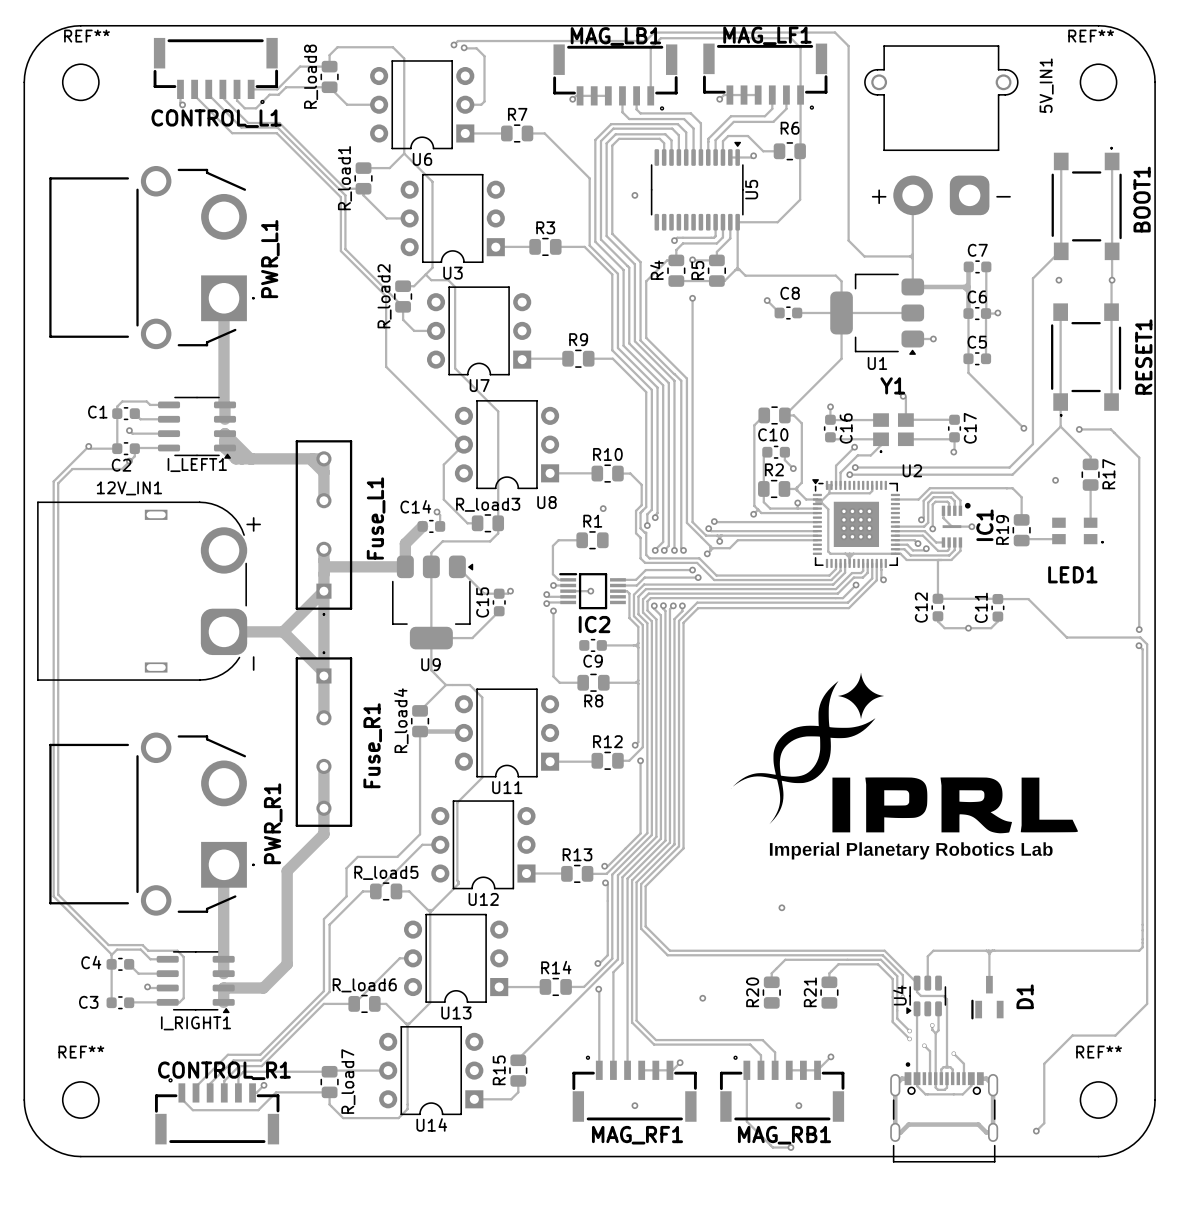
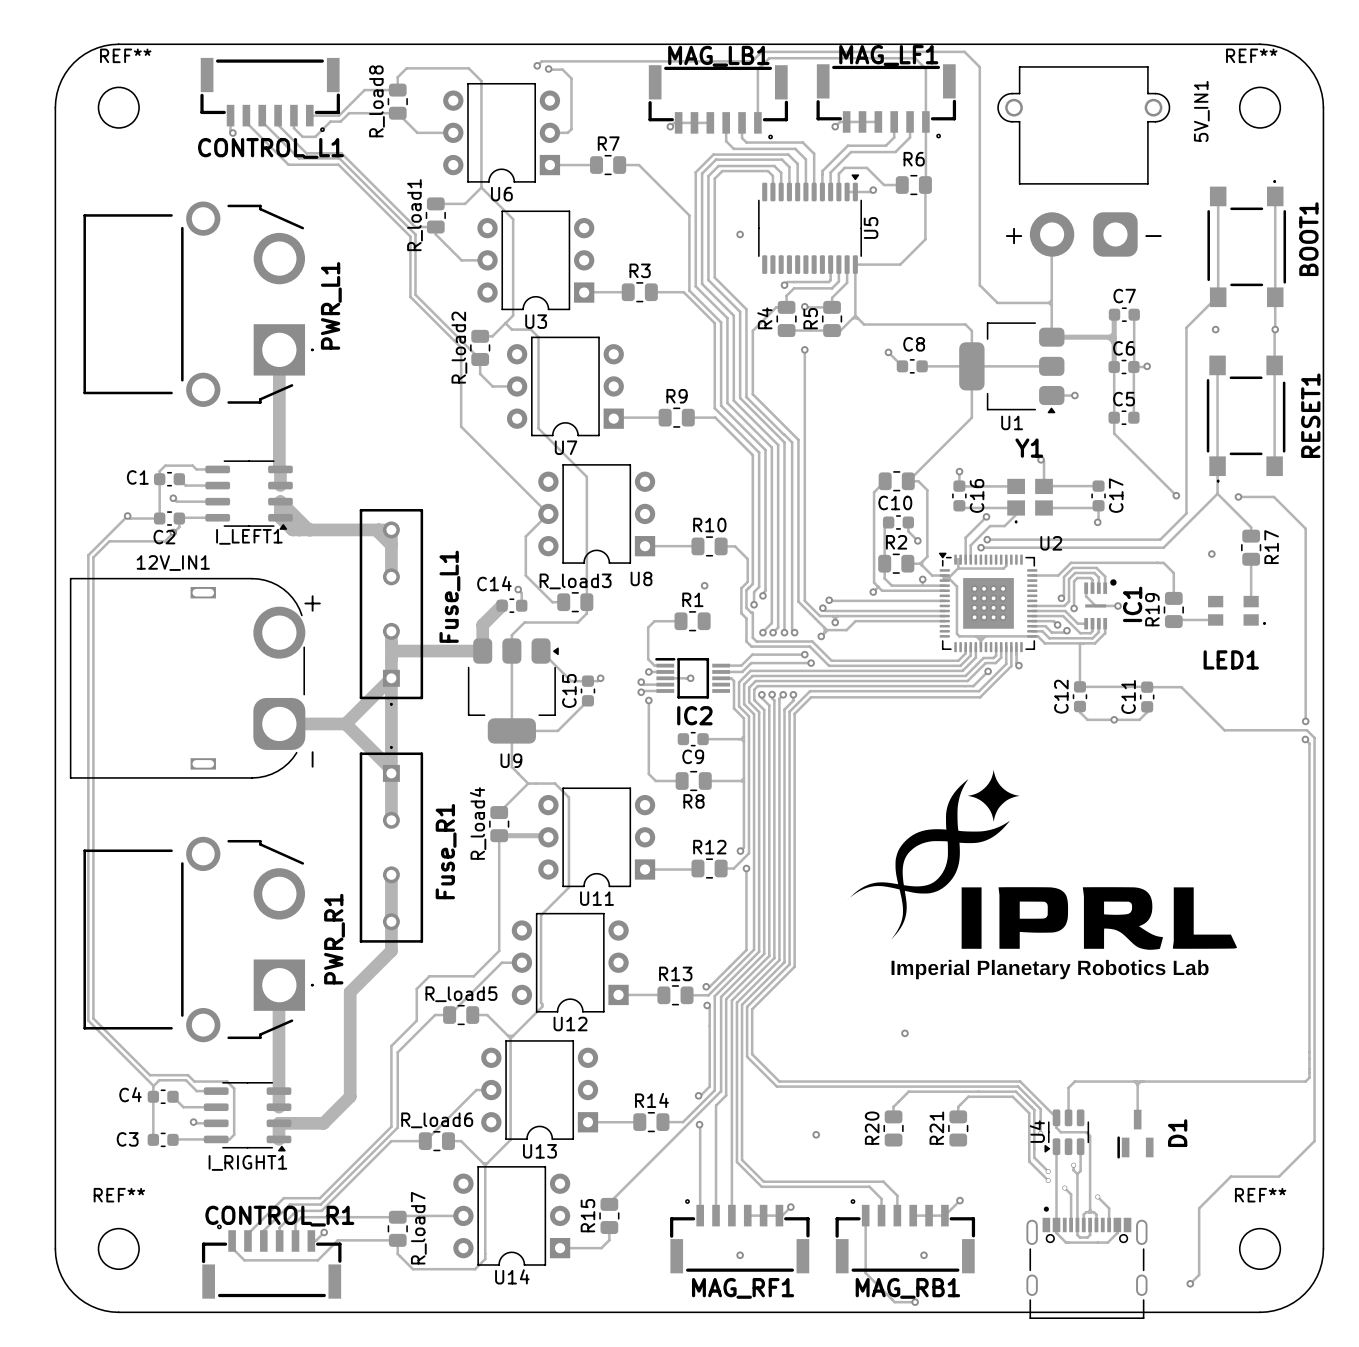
track: (907, 1078) (901, 1078) (895, 1085) (895, 1132) (900, 1132) (908, 1124) (978, 1124) (986, 1132) (993, 1132) (993, 1085) (986, 1078) (980, 1078) -> none

